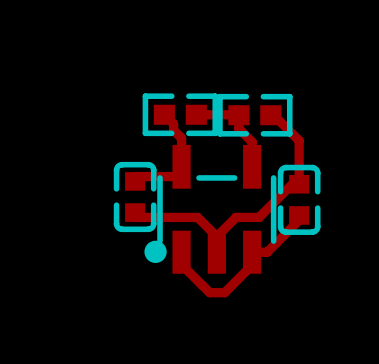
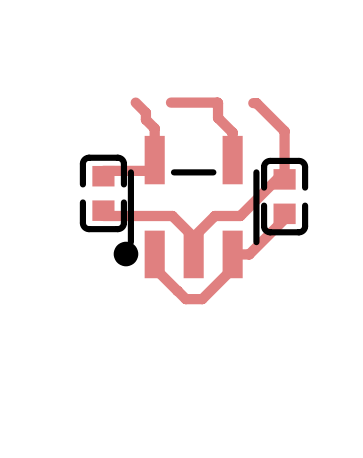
part: (180, 114) -> none
part: (254, 115) -> none

